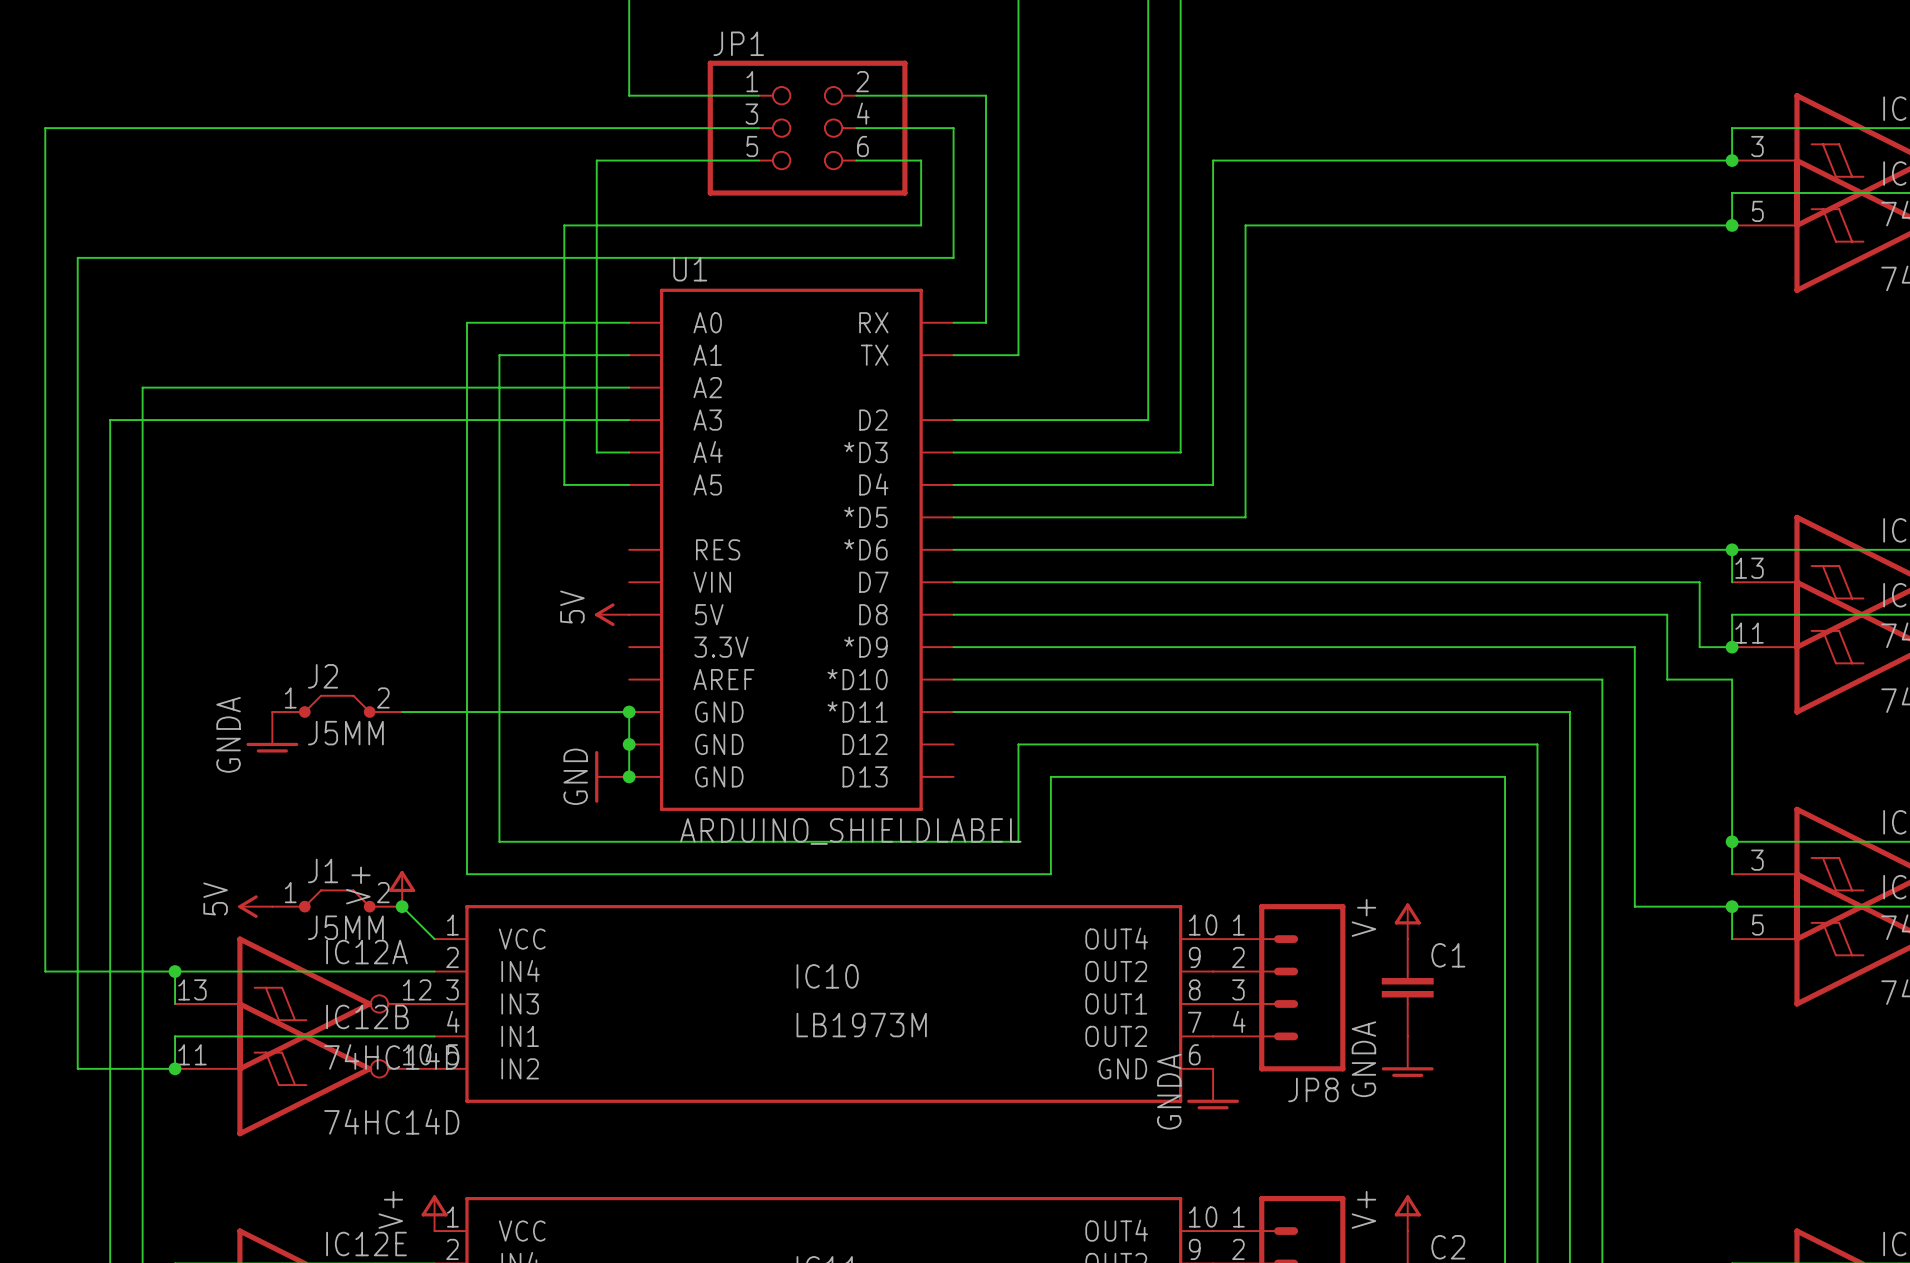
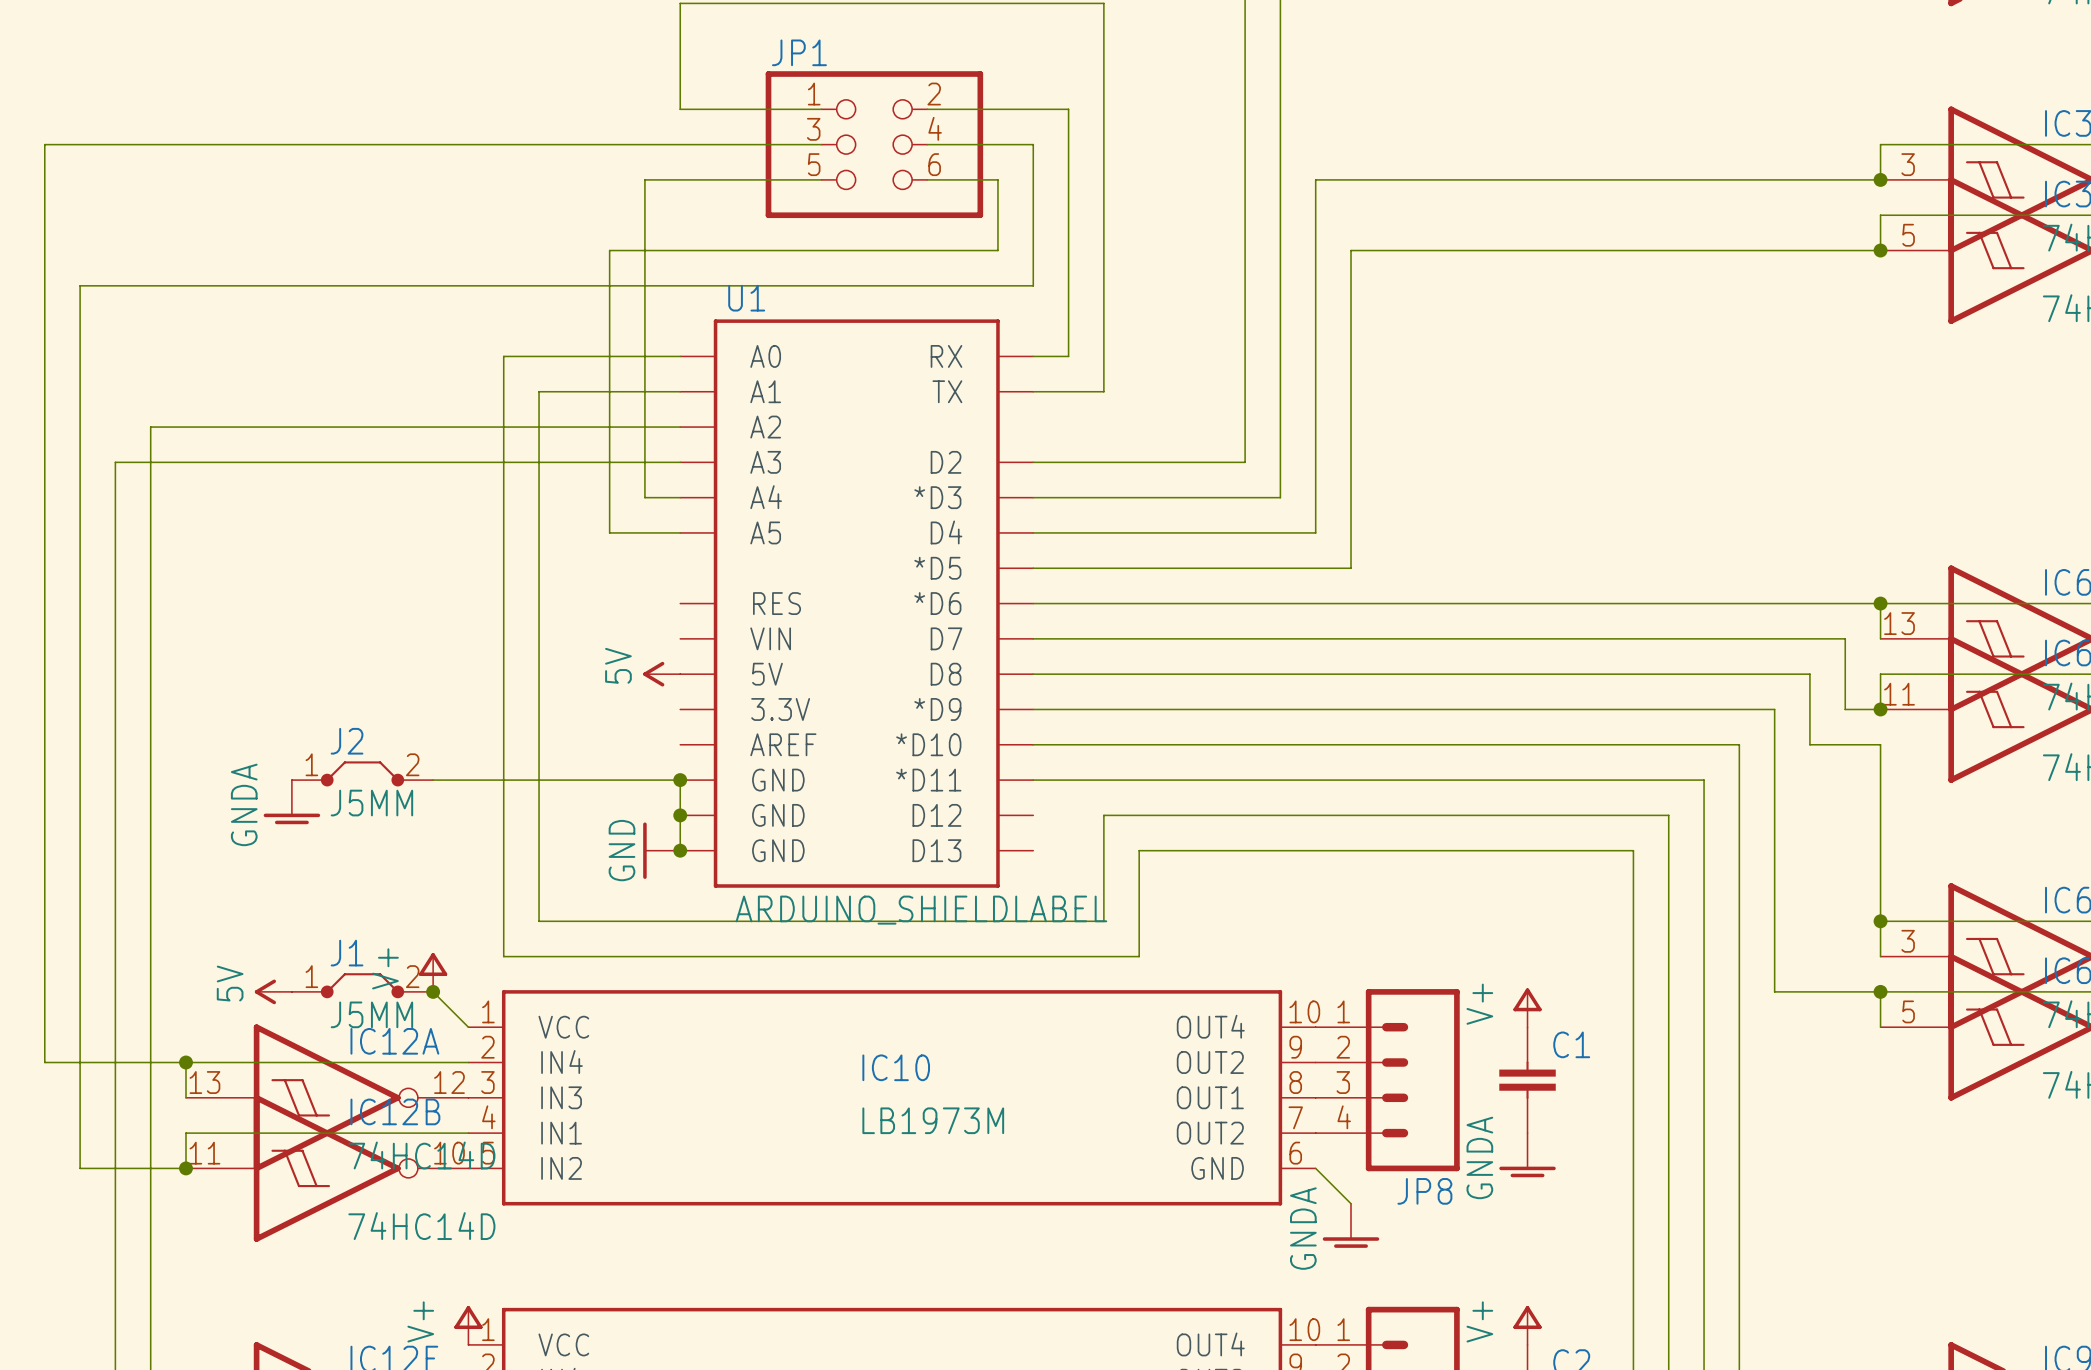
wire: none -> (1315, 1168) (1351, 1203)
power symbol position: GNDA (1213, 1089) -> GNDA (1351, 1225)

